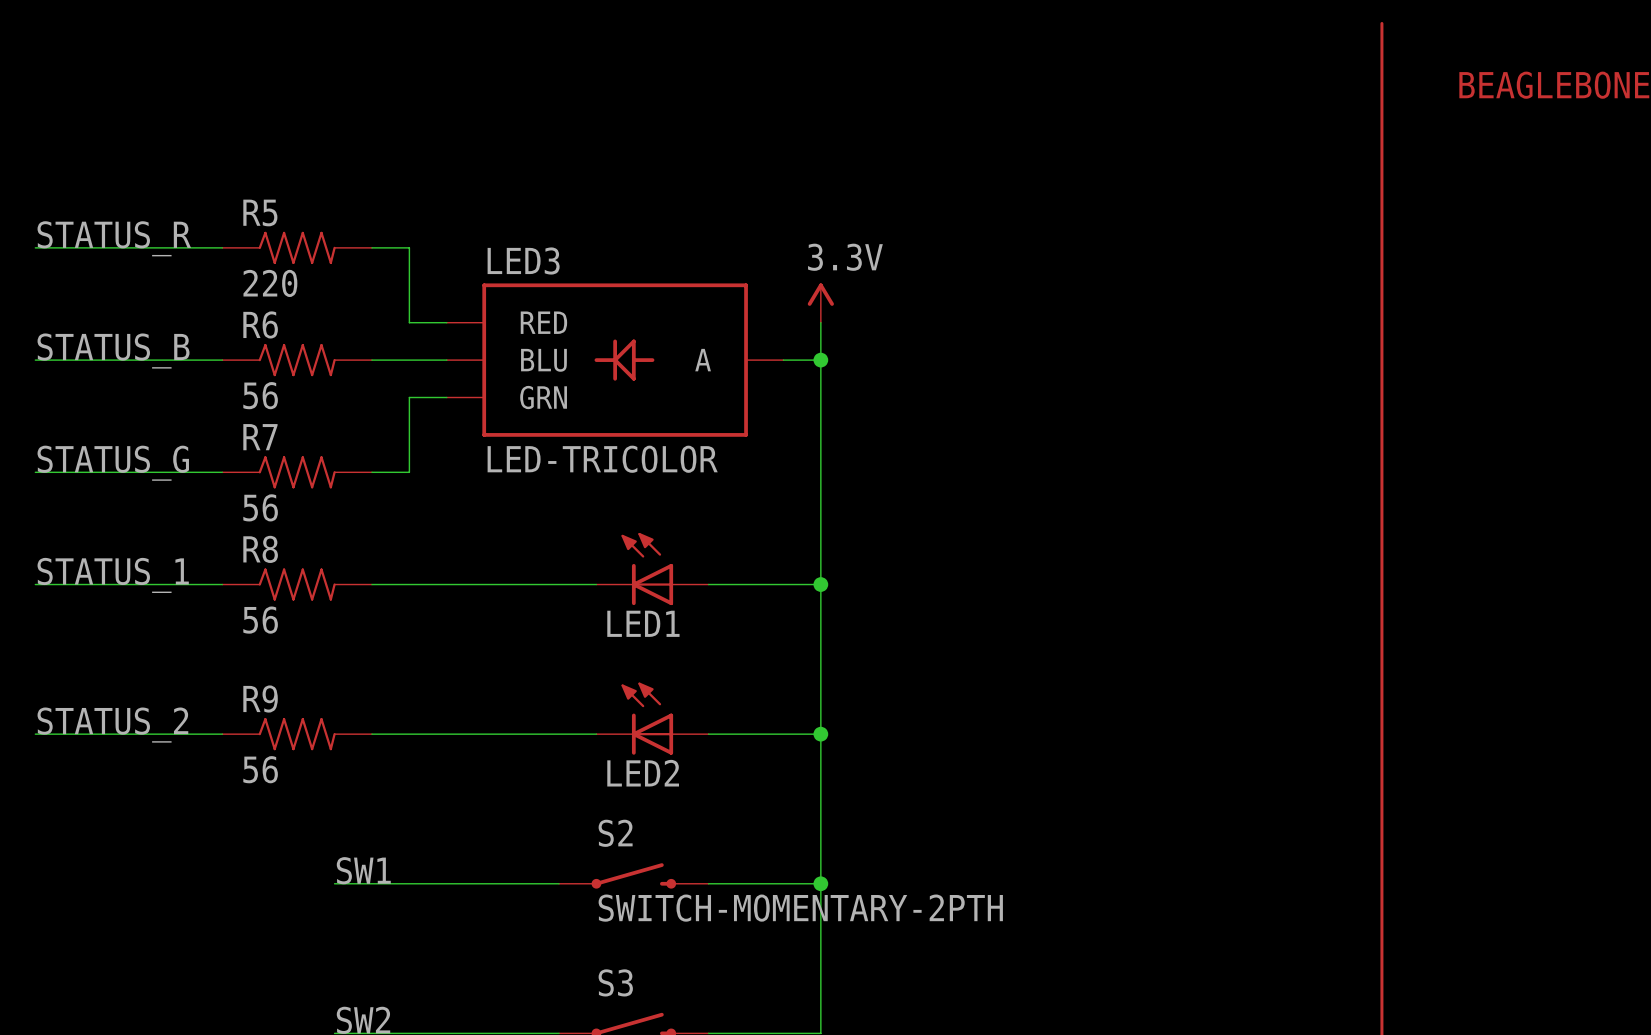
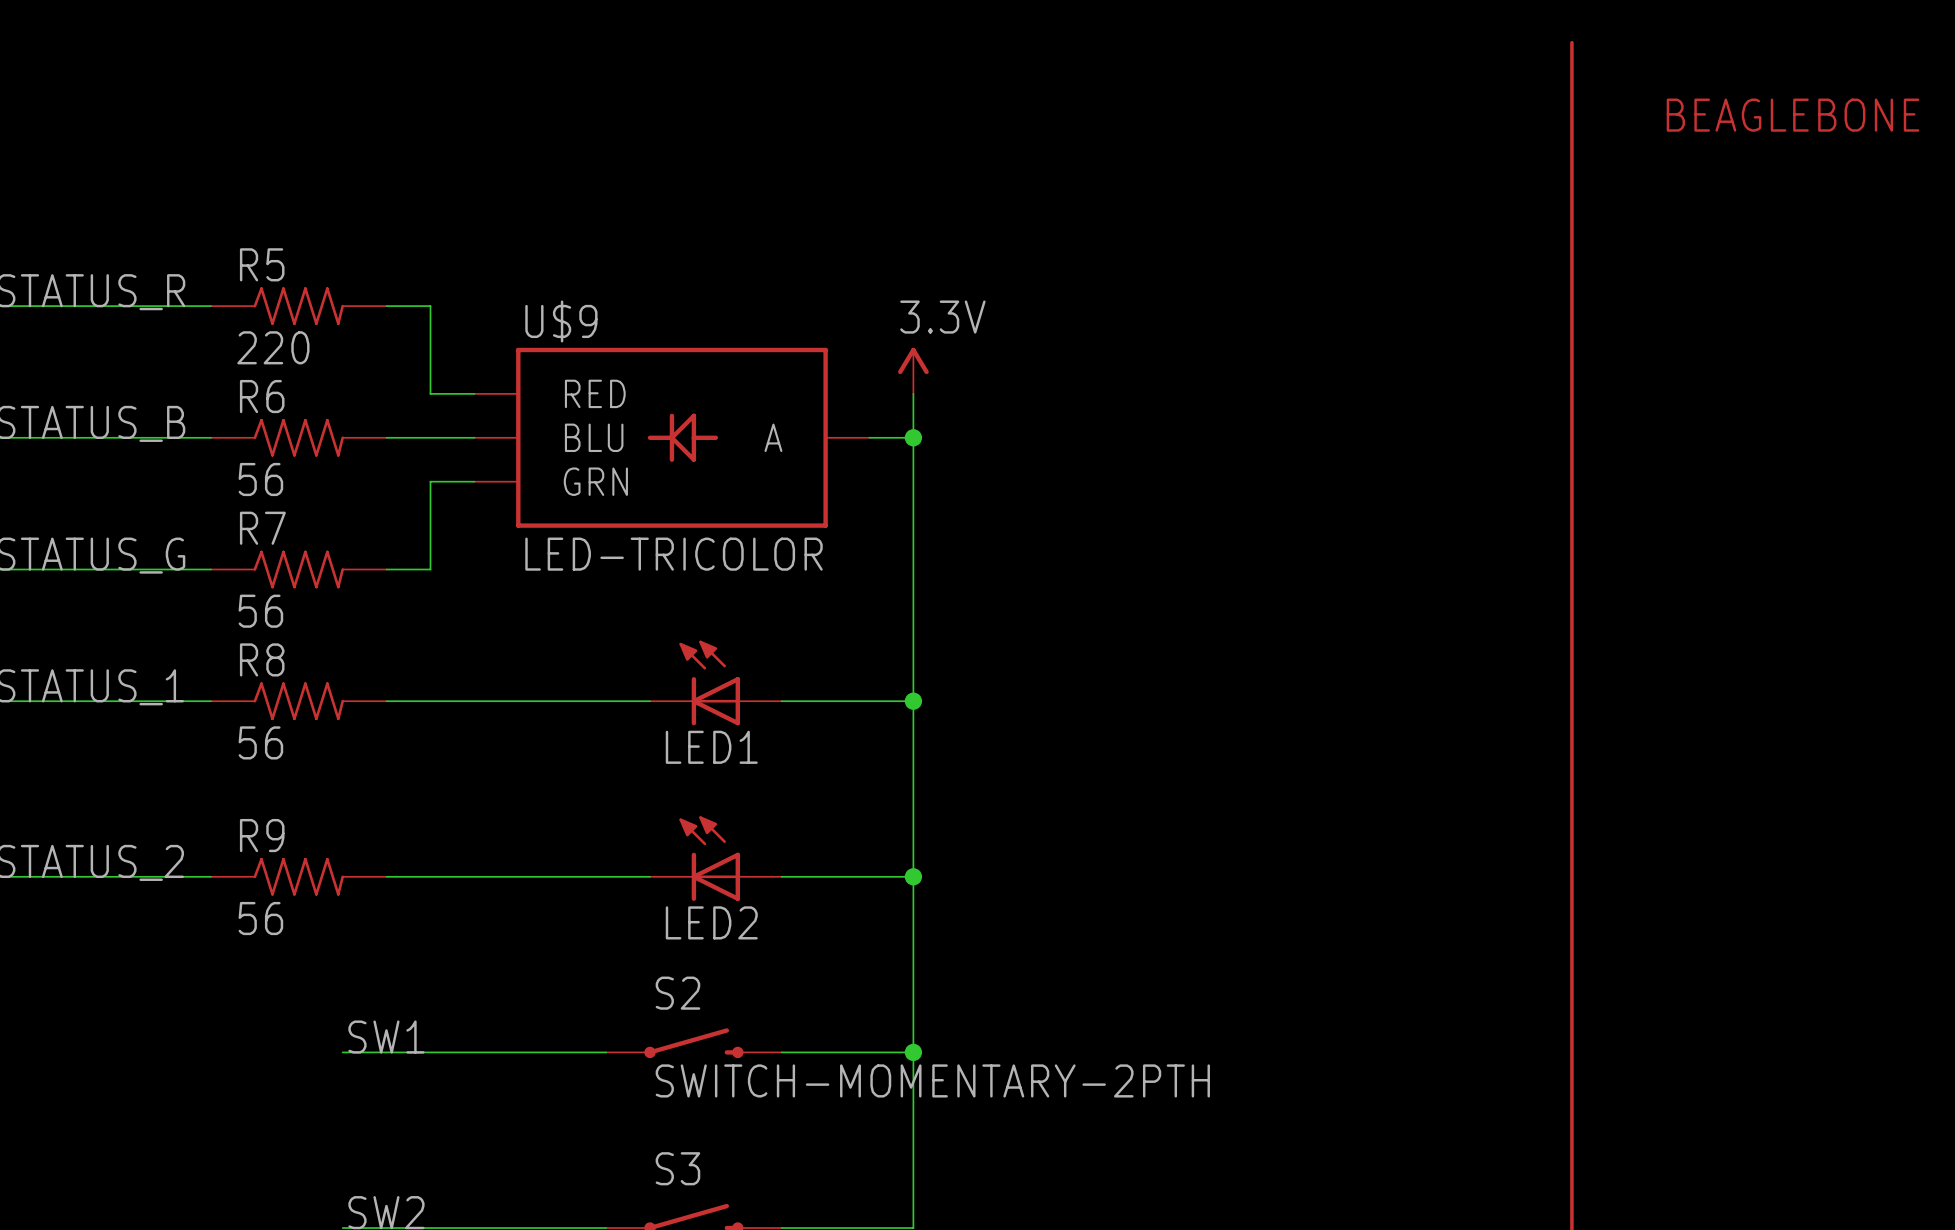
LED3 name: LED3 (523, 260) -> U$9 (561, 321)

